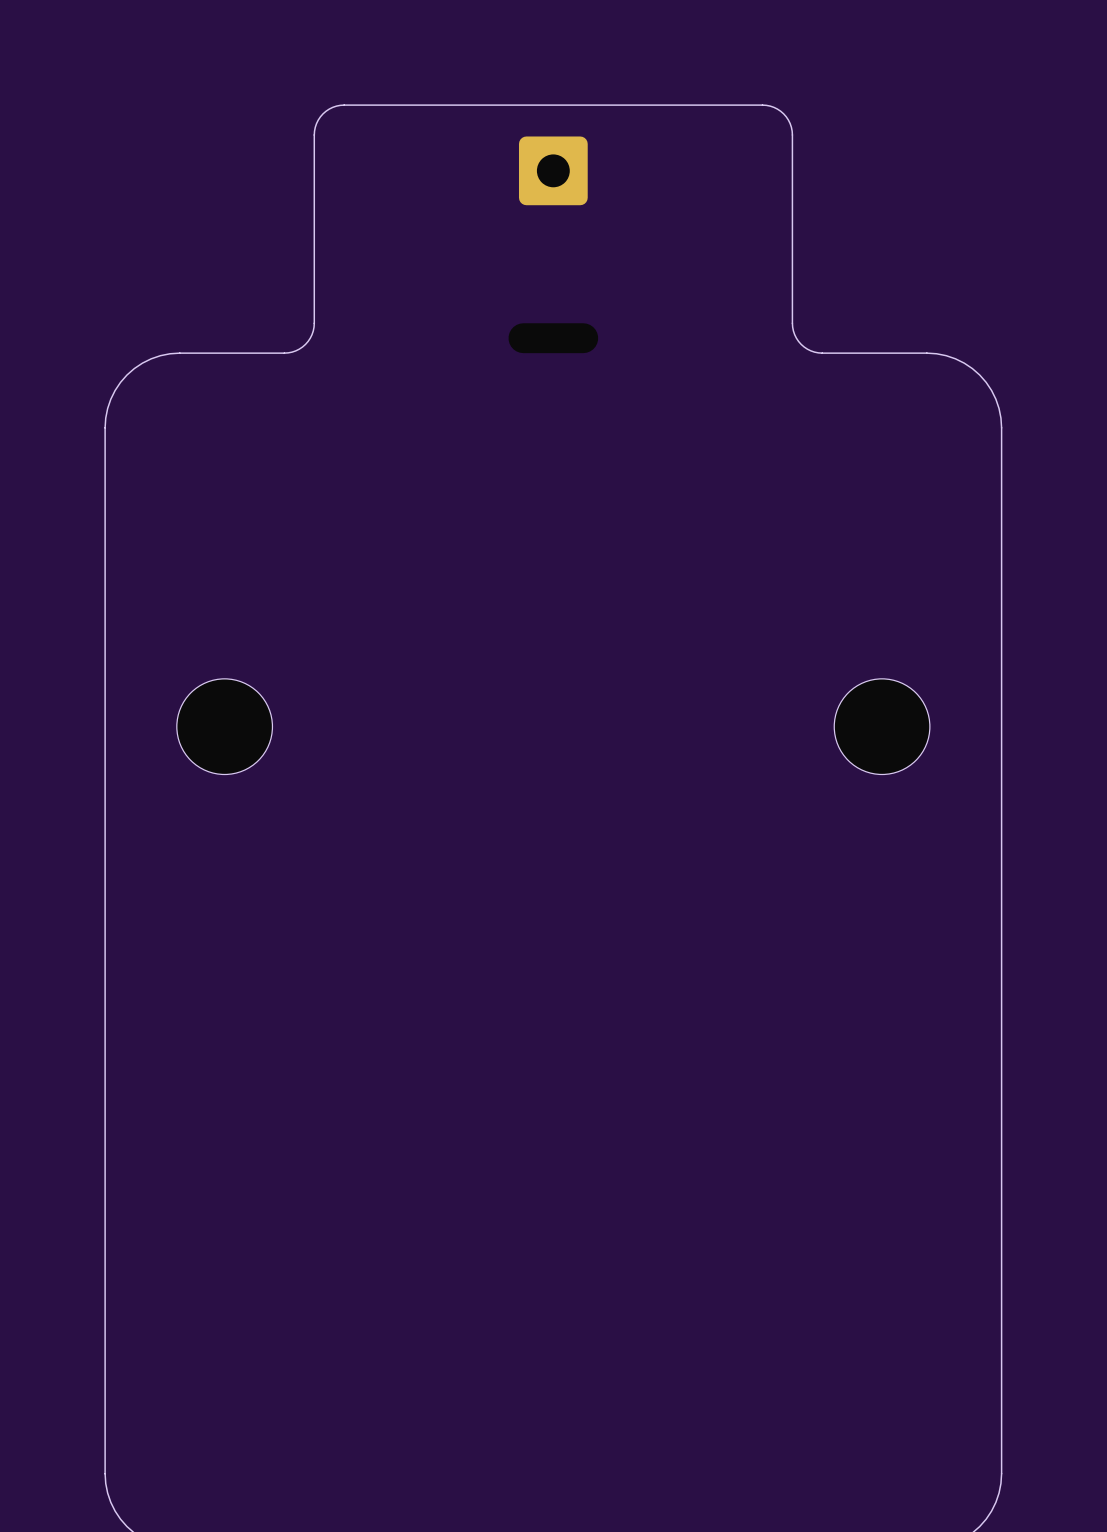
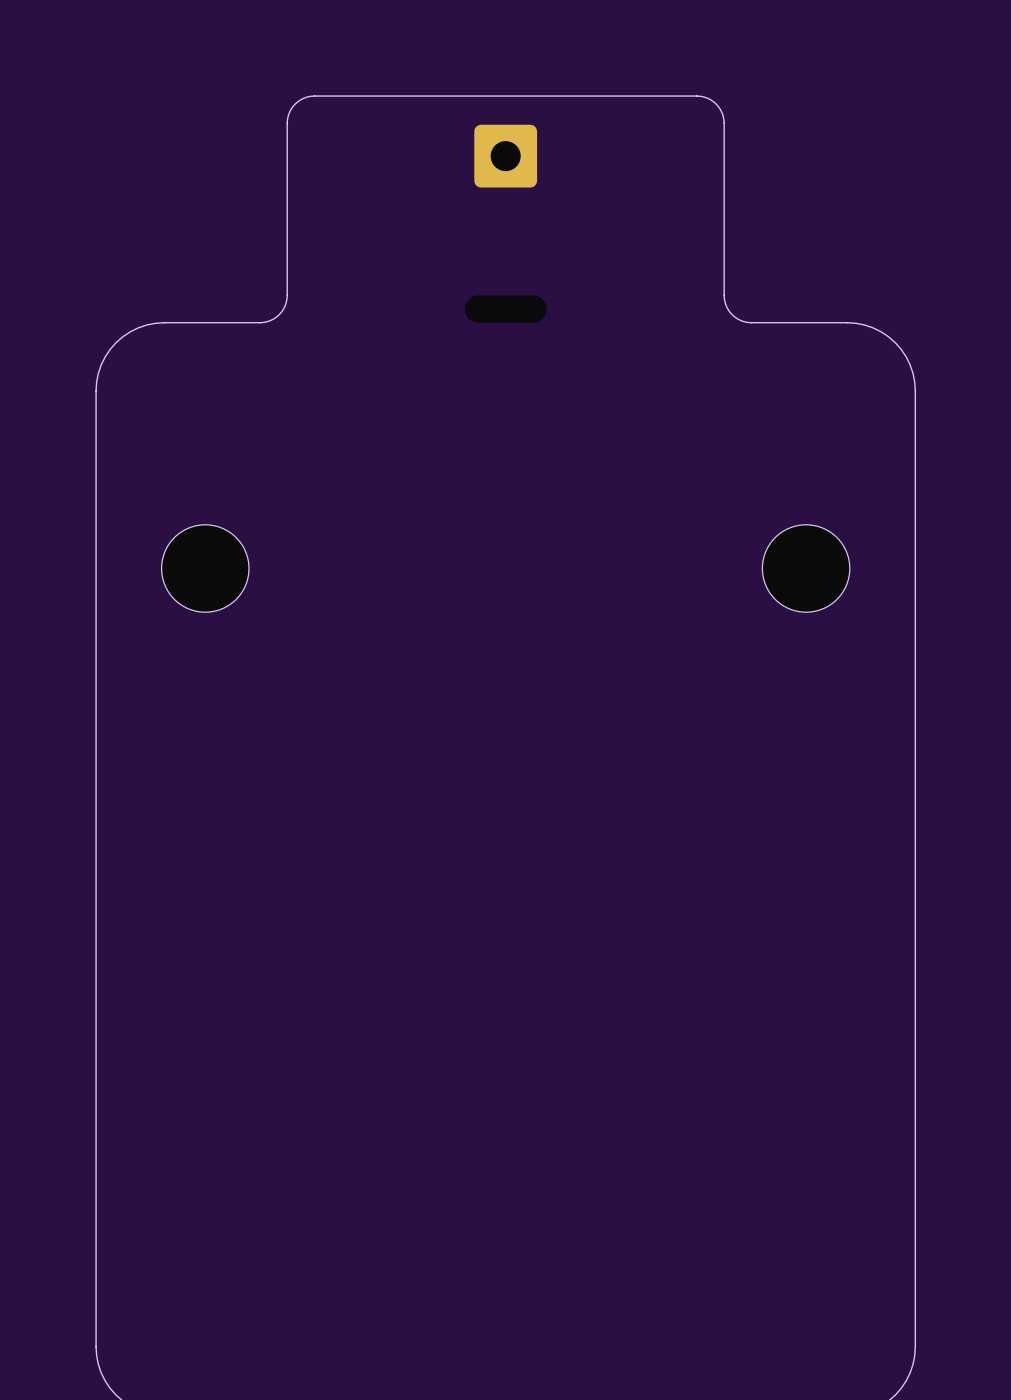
part position: (224, 726) -> (205, 568)
part position: (882, 726) -> (806, 568)

